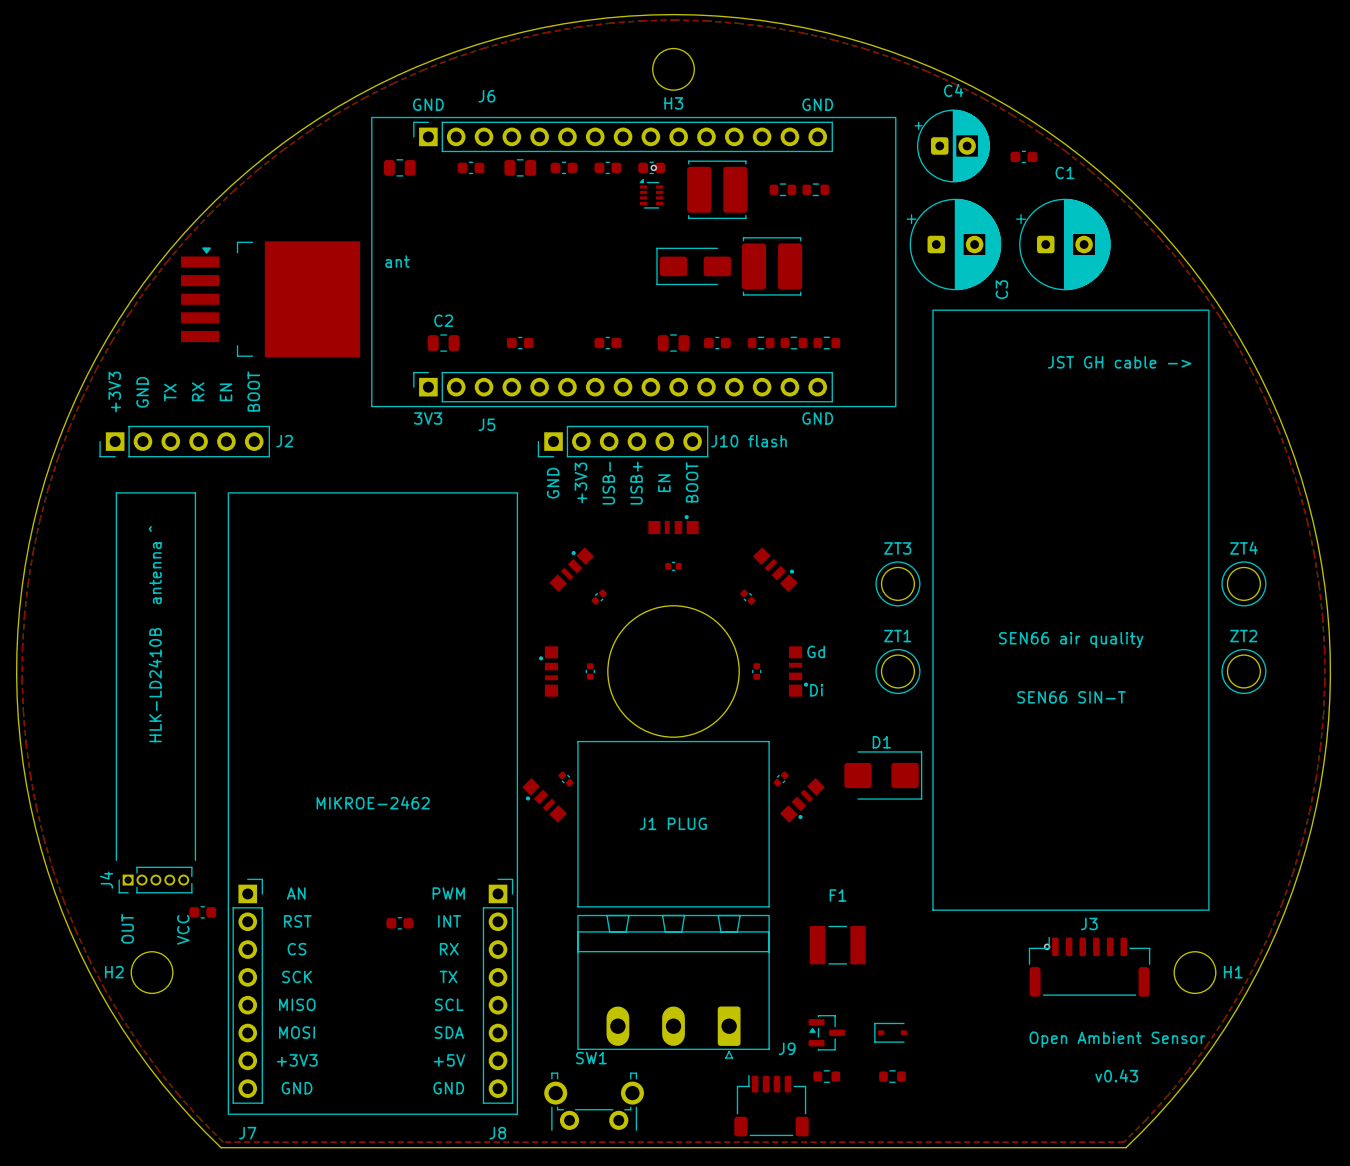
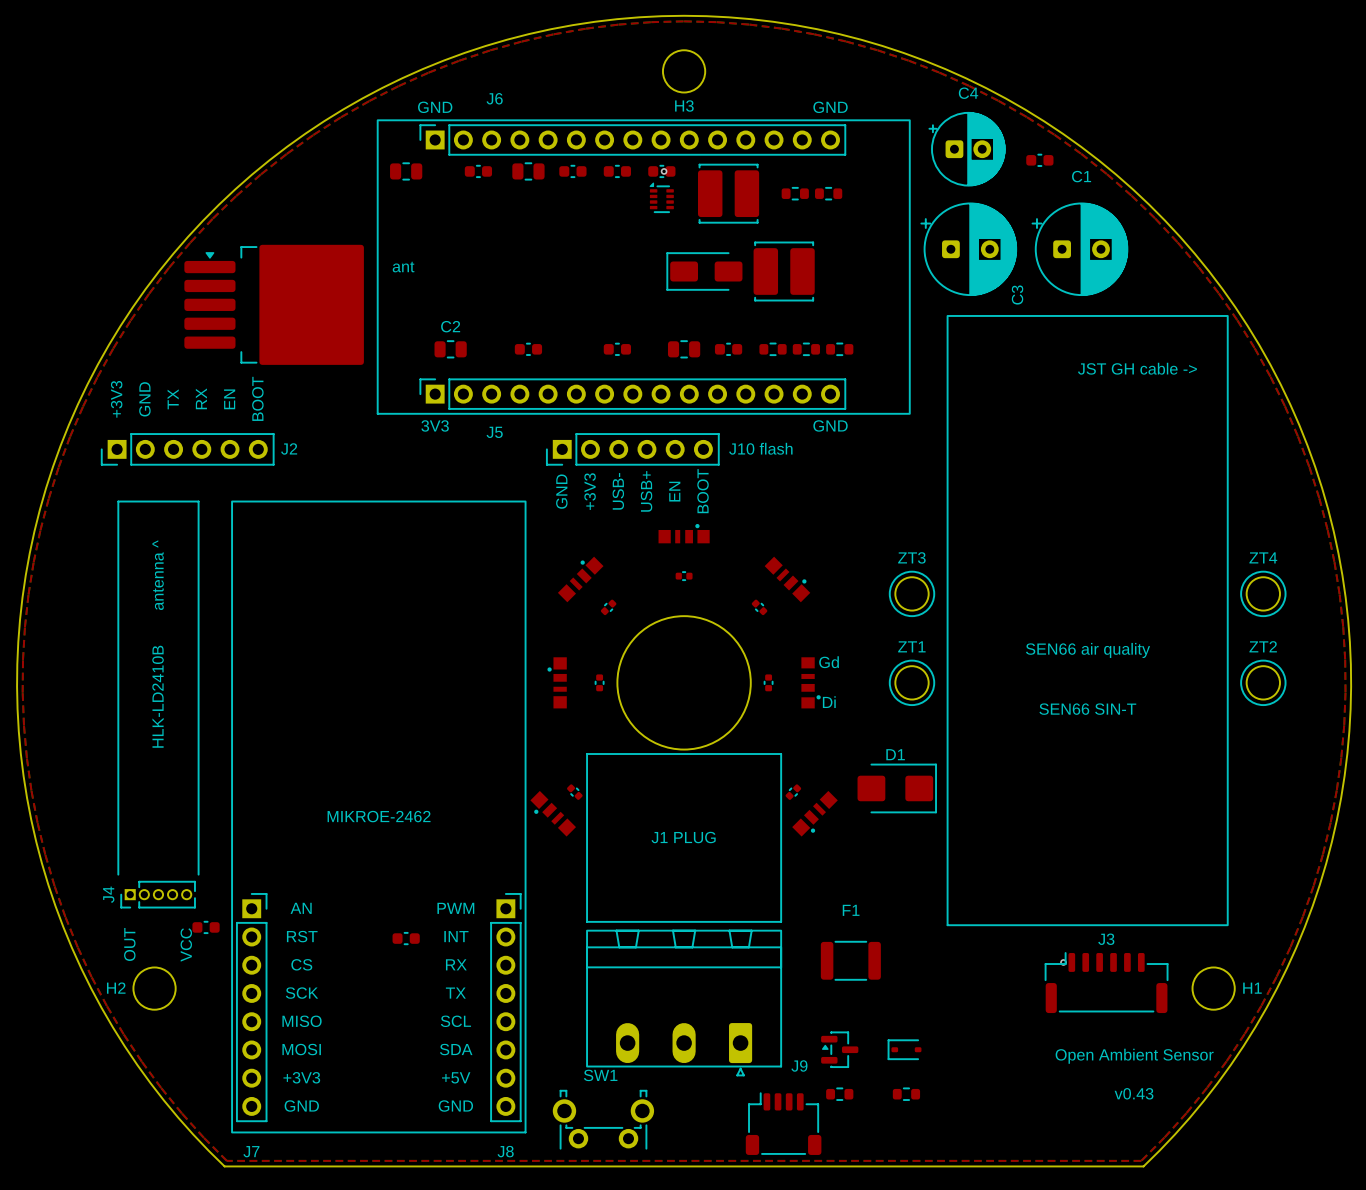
part footprint: [181, 241, 361, 358] -> [184, 244, 364, 365]
part footprint: [789, 646, 809, 697] -> [801, 657, 821, 709]
part footprint: [809, 925, 866, 965] -> [820, 941, 881, 981]

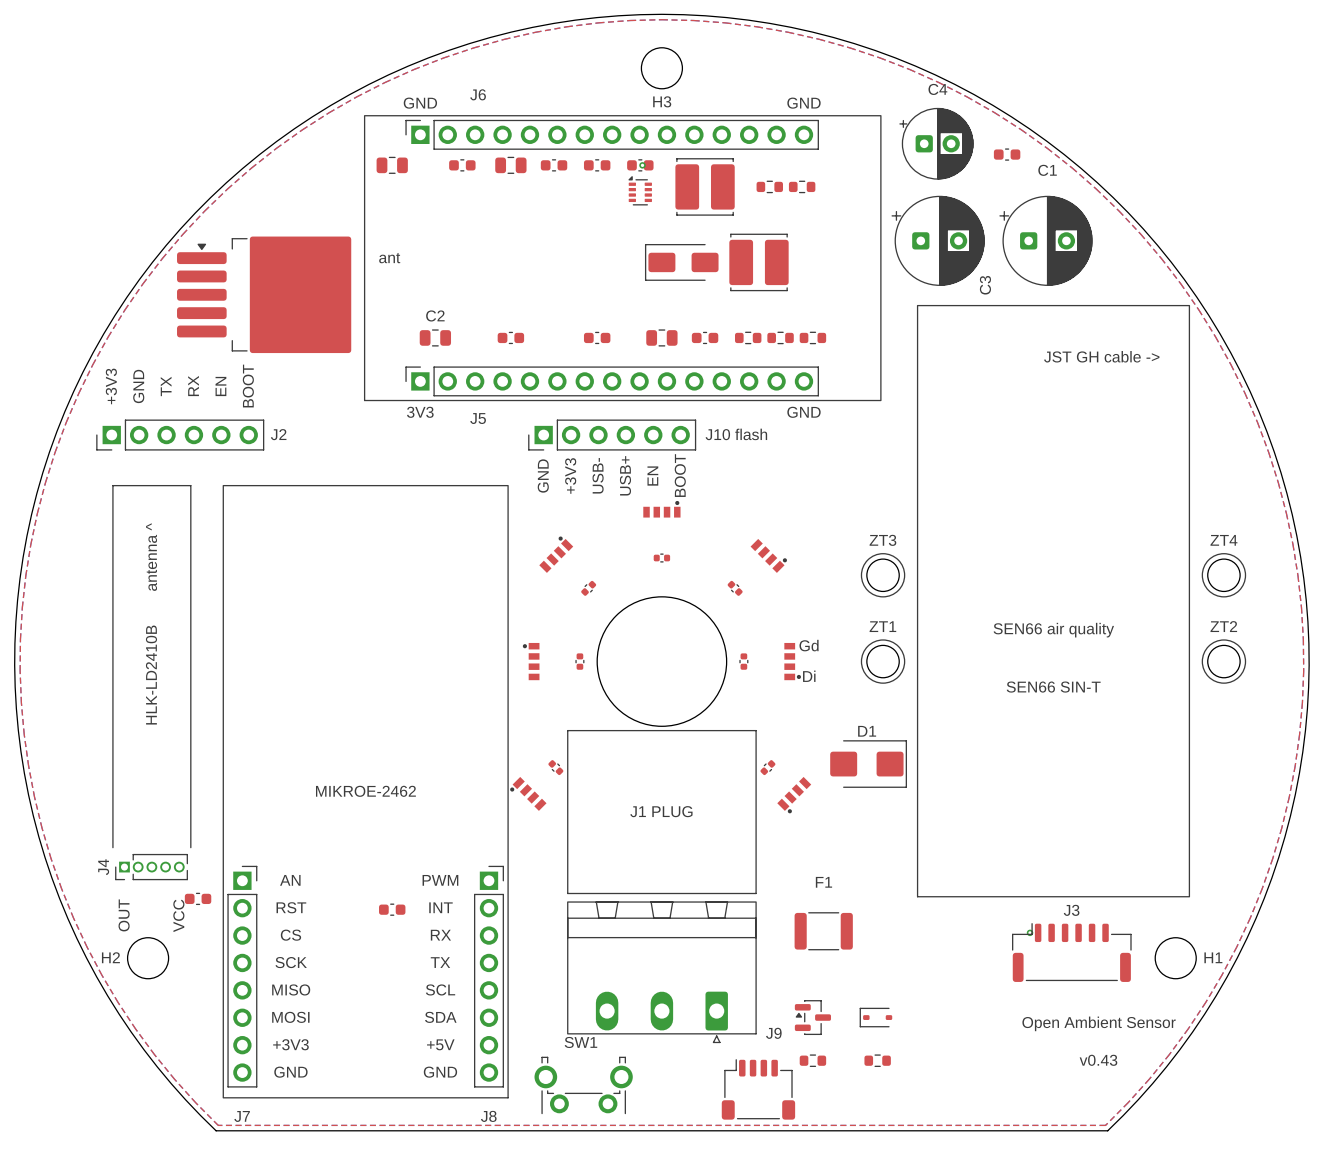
part footprint: [658, 523, 710, 544] -> [643, 500, 681, 518]
part footprint: [557, 556, 604, 603] -> [539, 536, 574, 573]
part footprint: [764, 556, 811, 603] -> [750, 538, 787, 573]
part footprint: [547, 657, 567, 709] -> [522, 642, 540, 681]
part footprint: [801, 657, 821, 709] -> [784, 642, 801, 681]
part footprint: [530, 790, 577, 837] -> [510, 776, 547, 811]
part footprint: [792, 790, 838, 837] -> [777, 776, 812, 814]

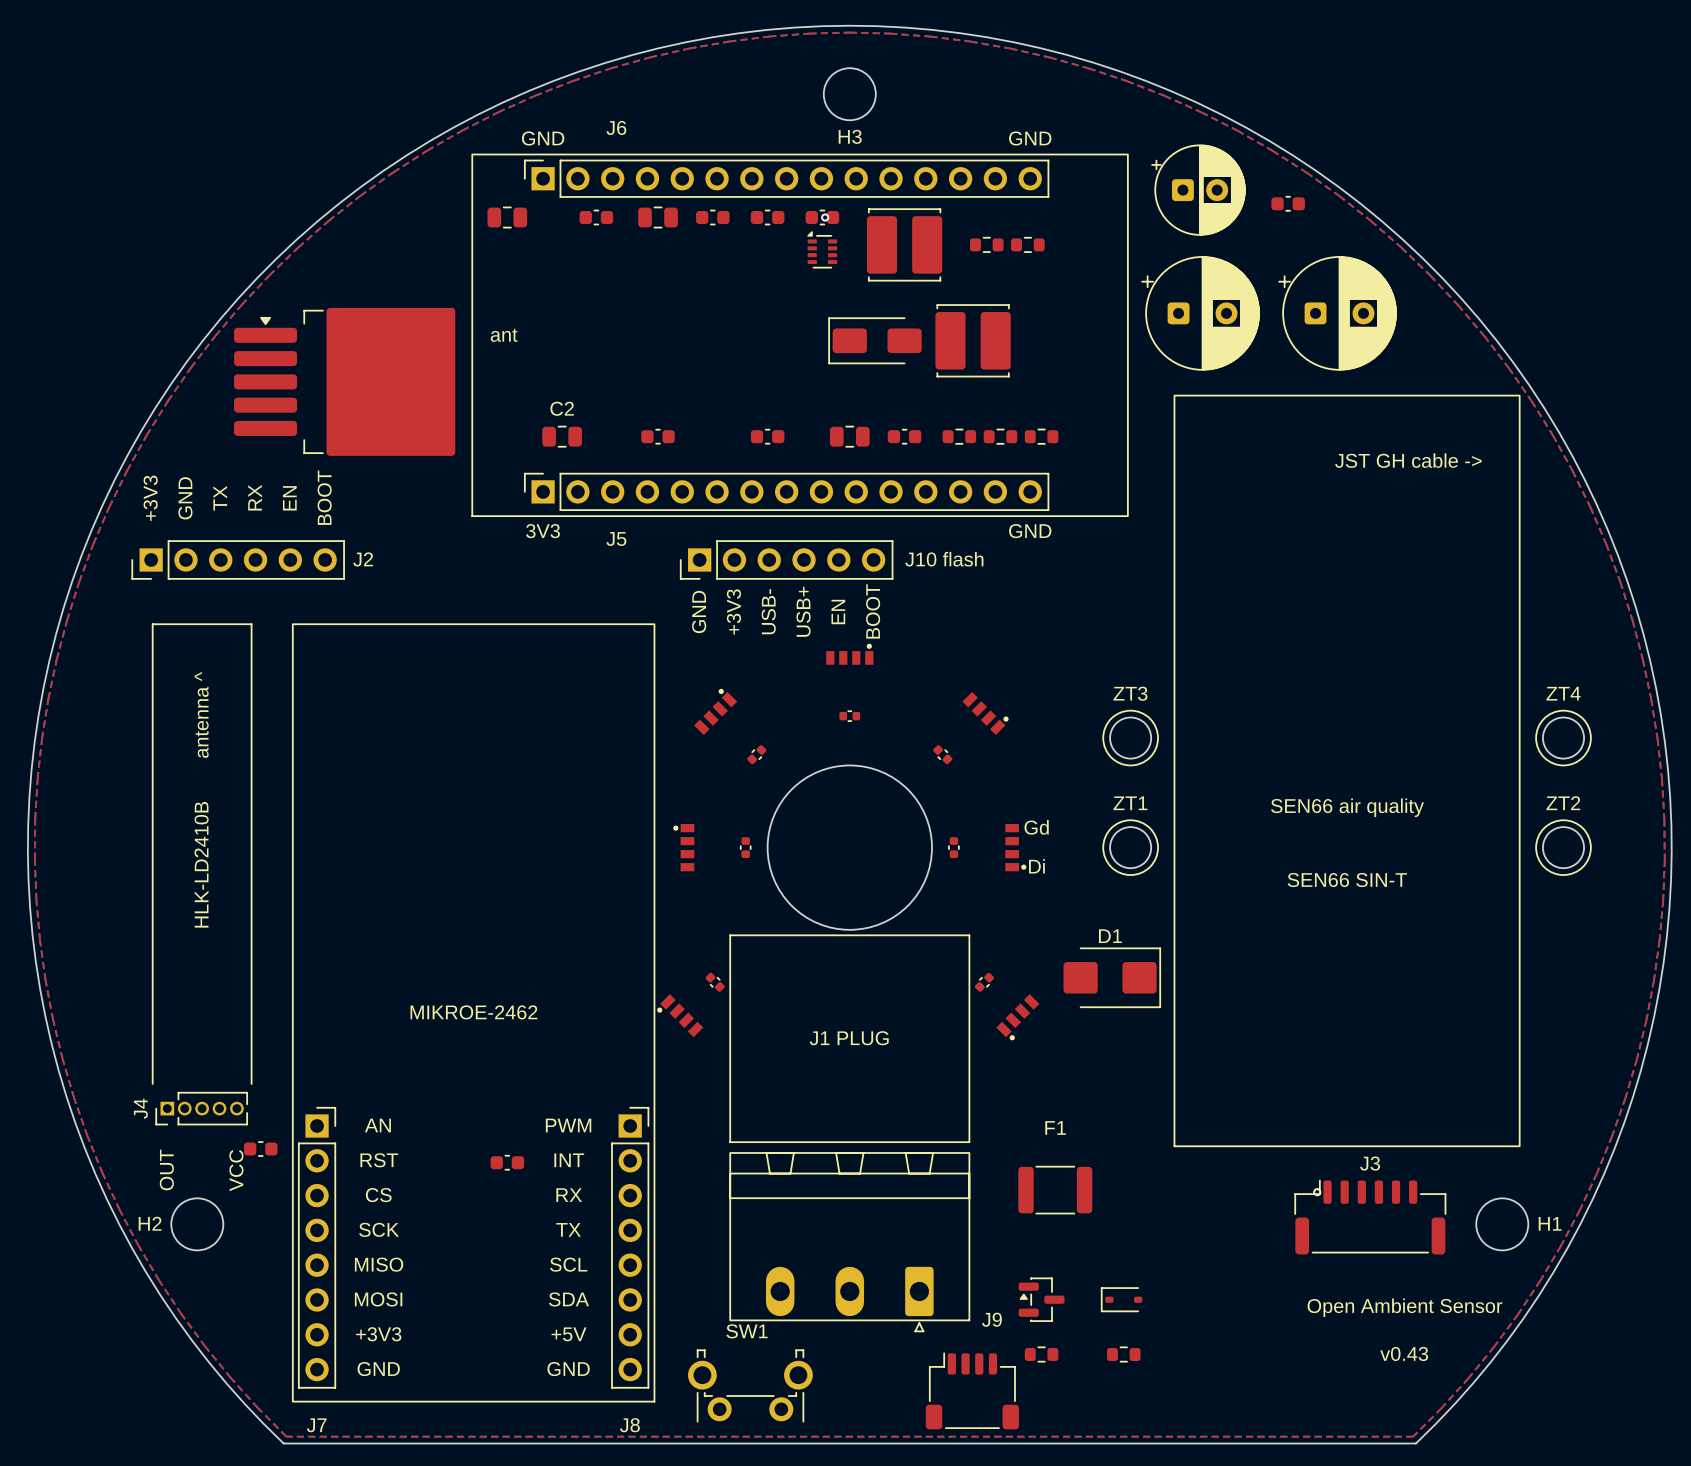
text: C4 (937, 89) -> none
text: C1 (1047, 170) -> none
text: C3 (985, 285) -> none

